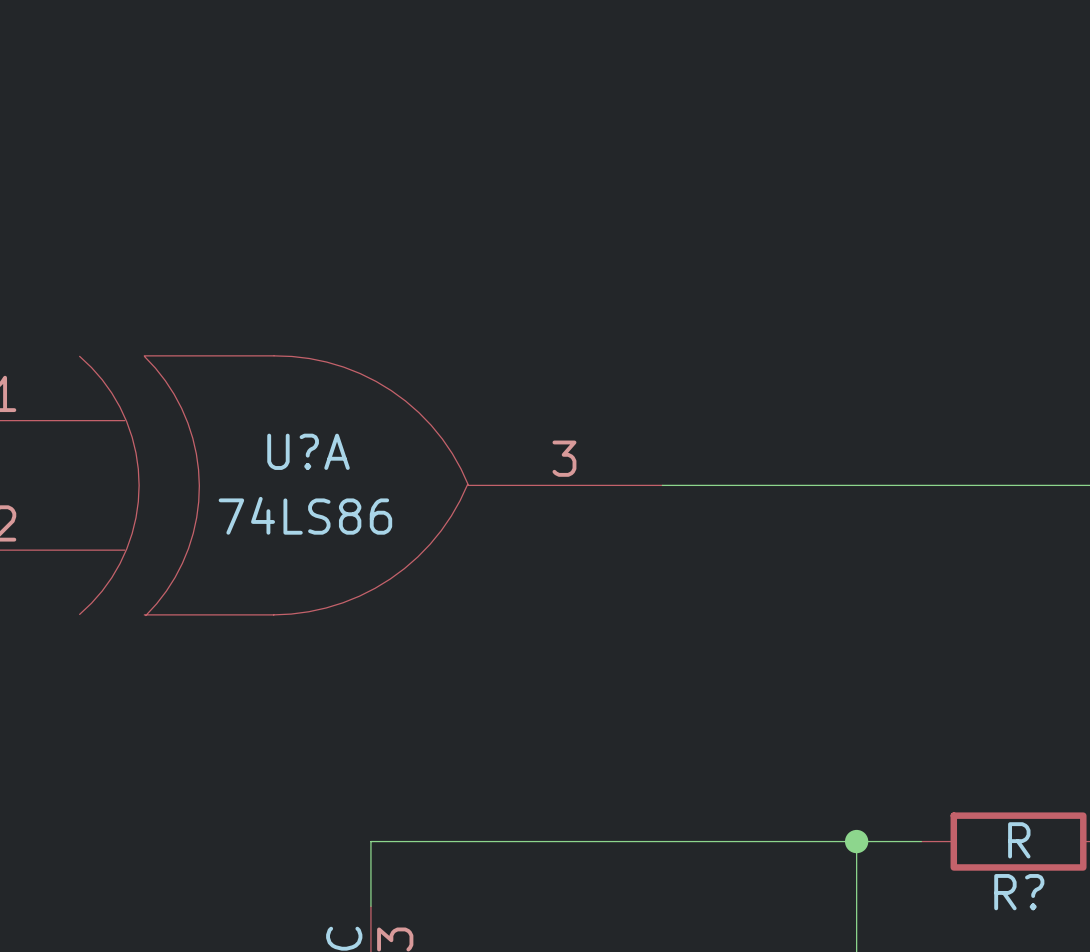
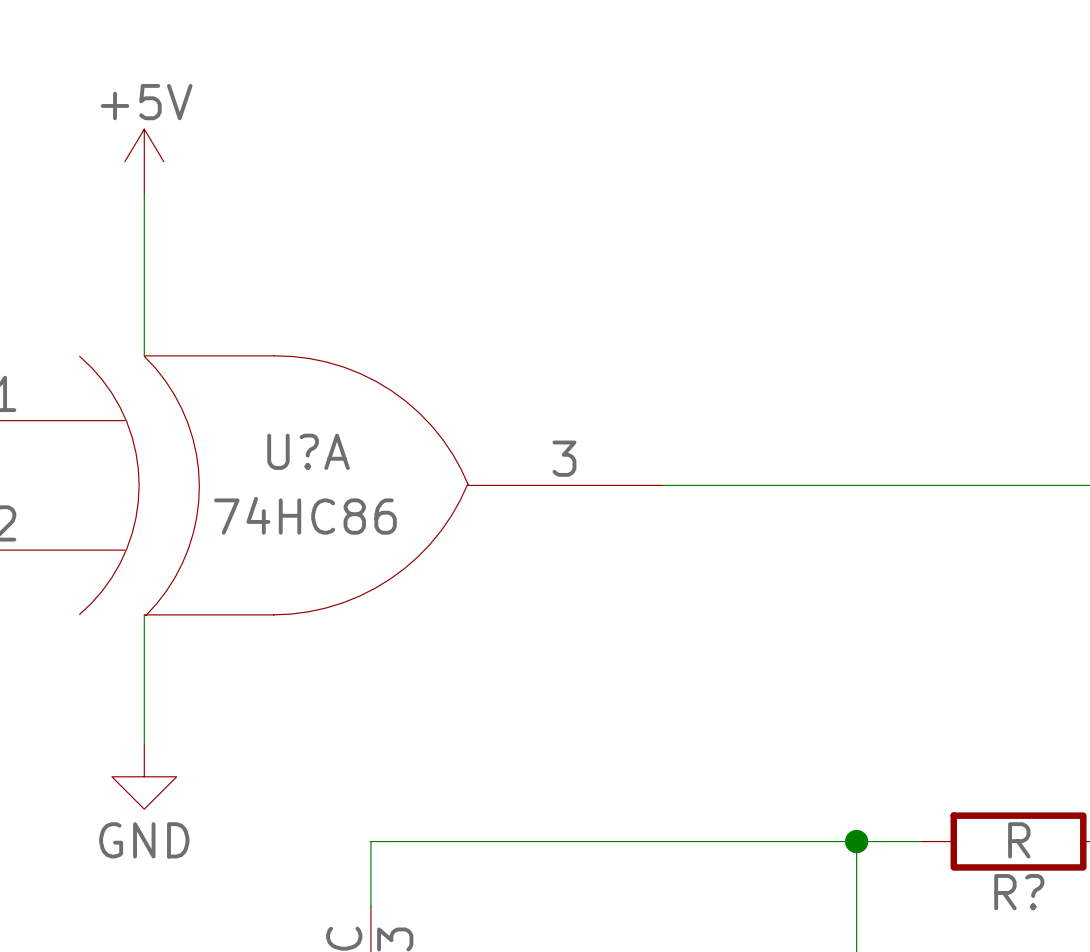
power symbol: none -> +5V (144, 161)
wire: none -> (144, 193) (144, 355)
U?A value: 74LS86 (305, 515) -> 74HC86 (305, 515)
wire: none -> (144, 614) (144, 744)
power symbol: none -> GND (144, 776)

